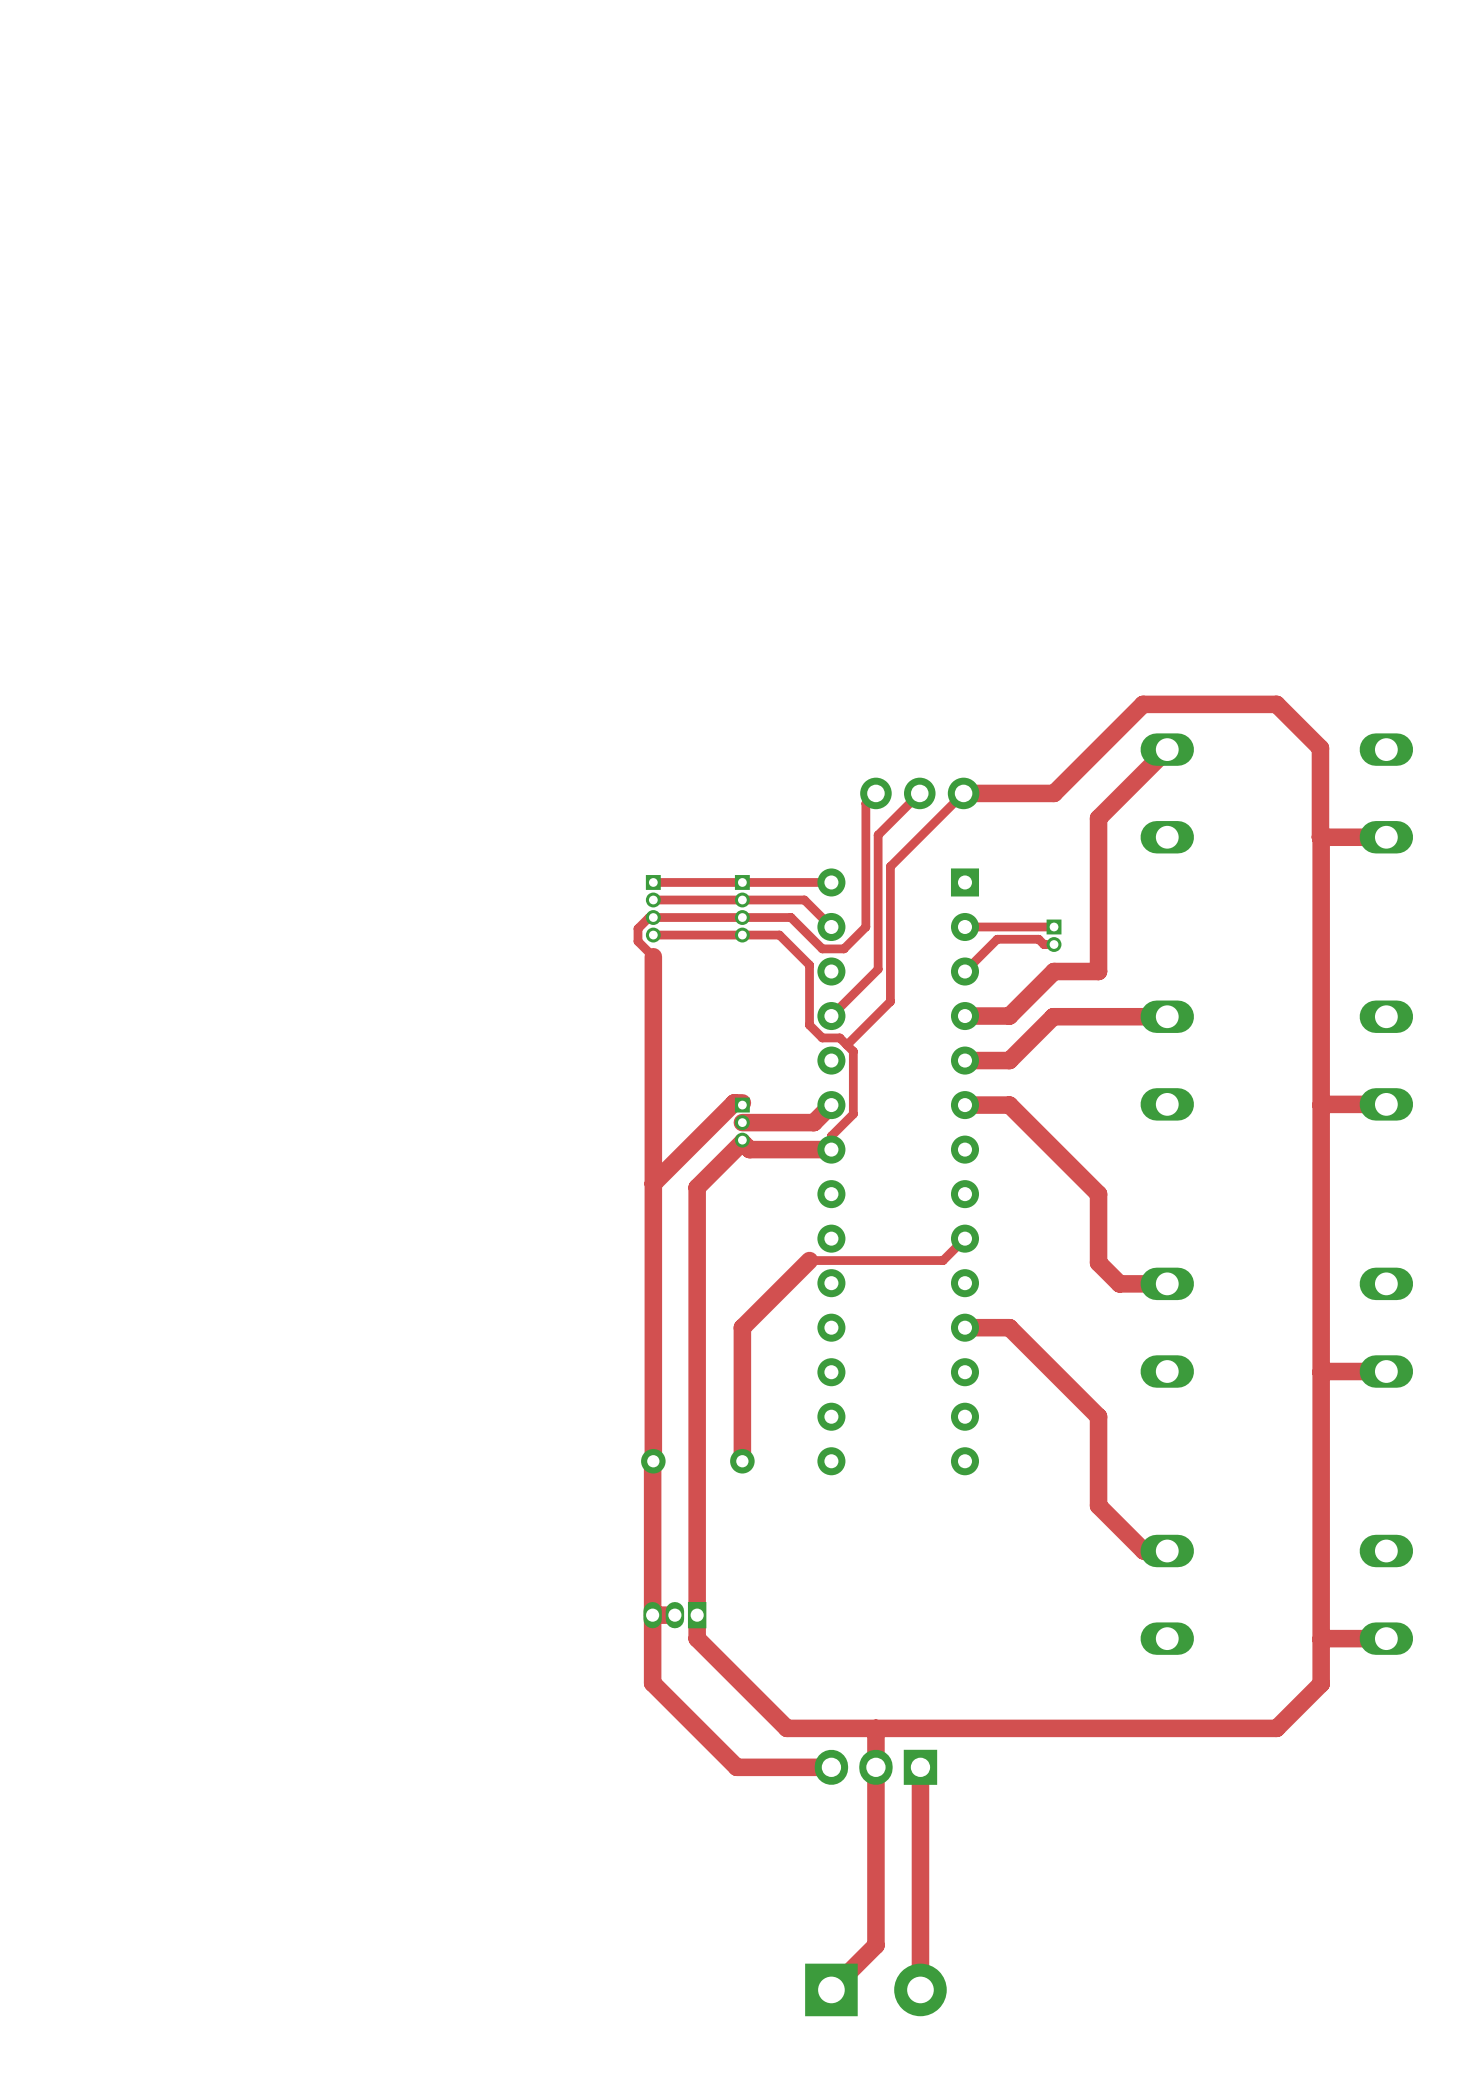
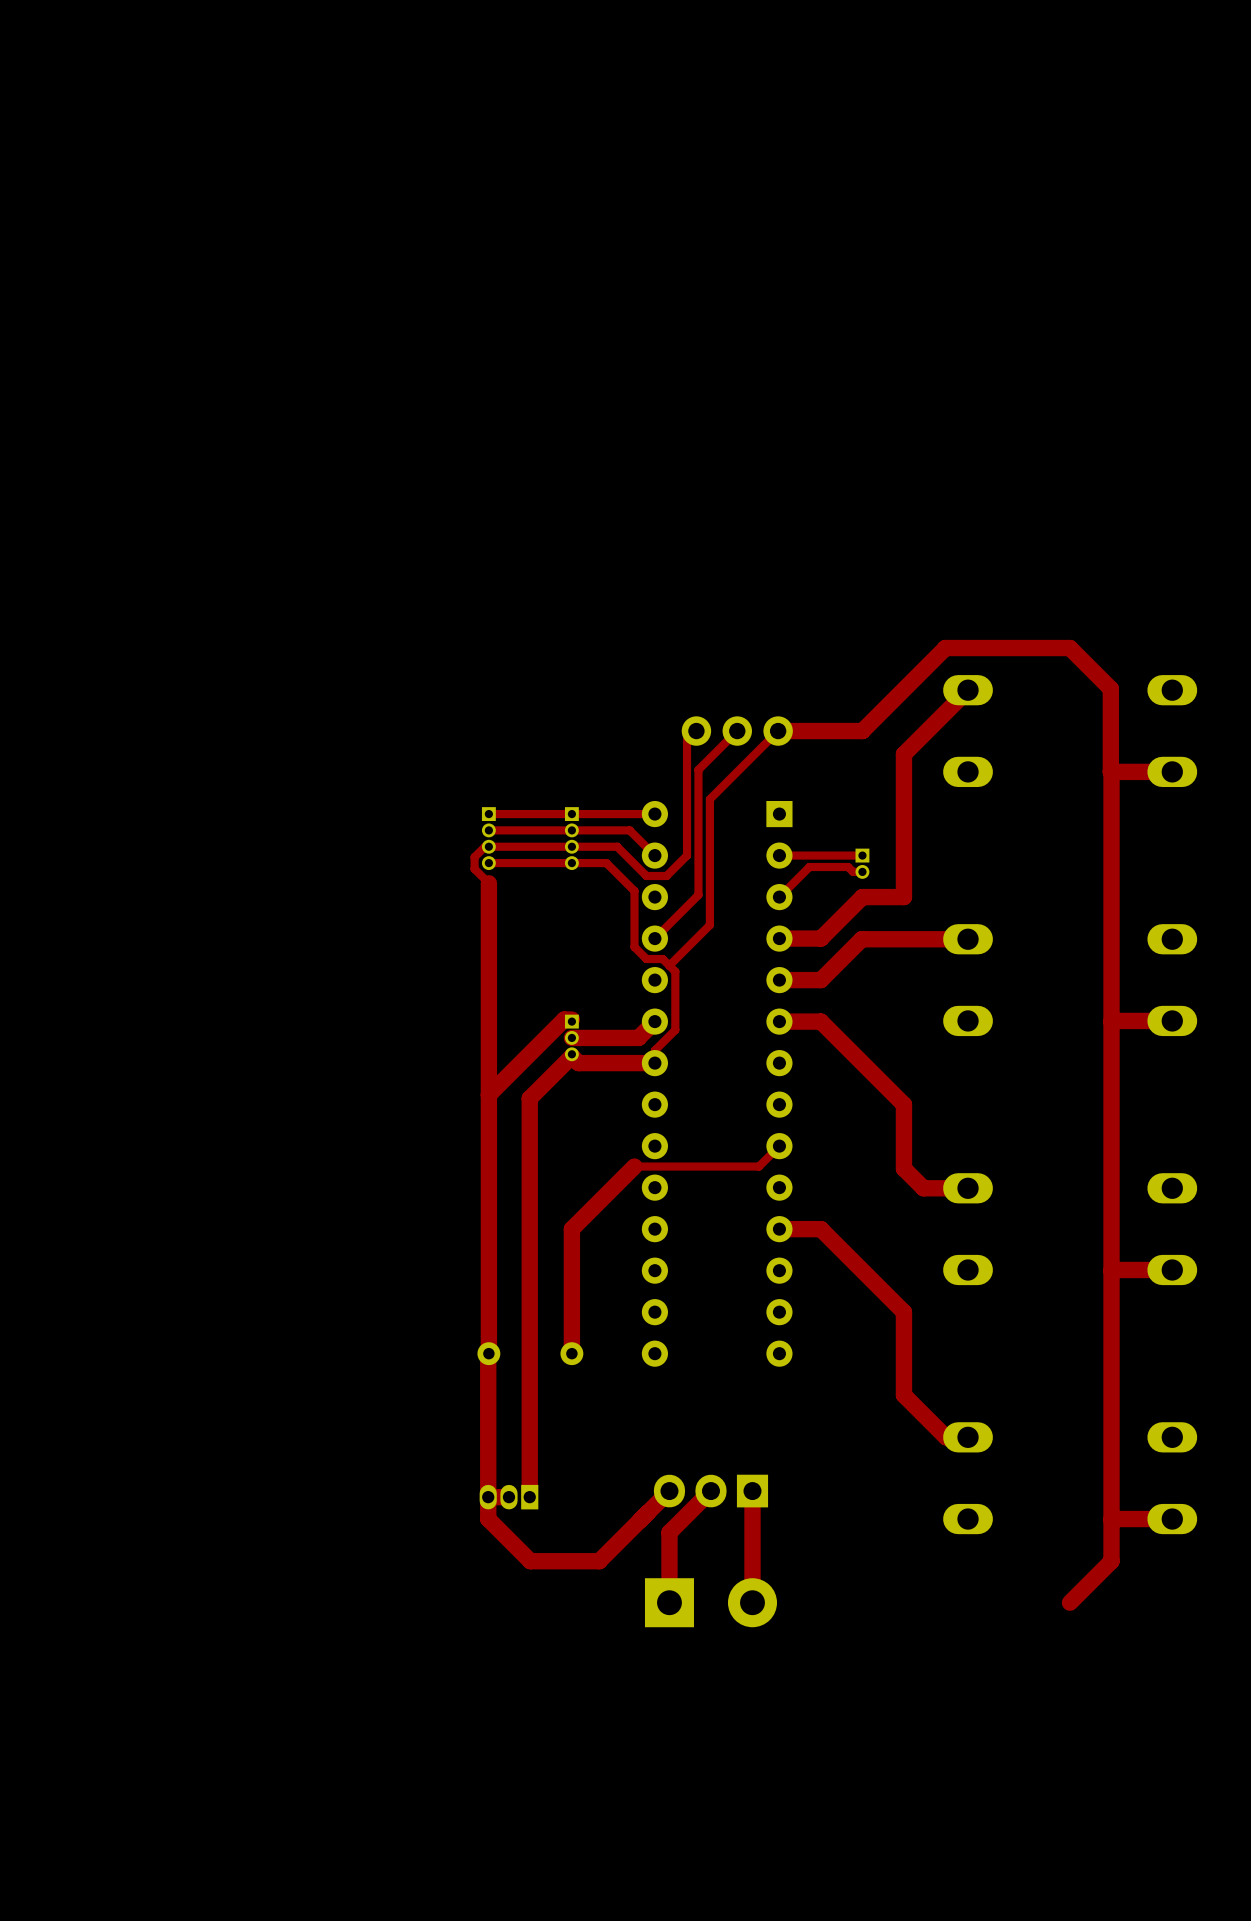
top track: none -> (710, 1491) (669, 1532) (669, 1602)
top track: none -> (752, 1491) (752, 1602)
top track: (697, 1615) (697, 1638) (786, 1728) (1276, 1728) -> none
top track: (652, 1638) (652, 1683) (736, 1767) (831, 1767) -> (488, 1519) (530, 1561) (599, 1561) (669, 1491)
top track: (875, 1728) (875, 1945) (831, 1989) (837, 1989) -> none
part position: (875, 1767) -> (710, 1491)
top track: (920, 1767) (920, 1989) -> none
part position: (875, 1989) -> (710, 1602)

